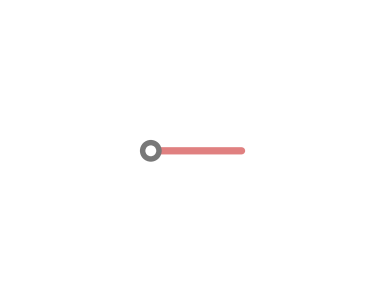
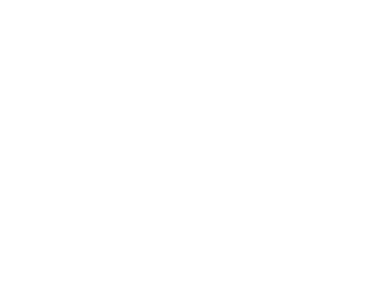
via: (150, 150) -> none
top track: (241, 150) (150, 150) -> none

